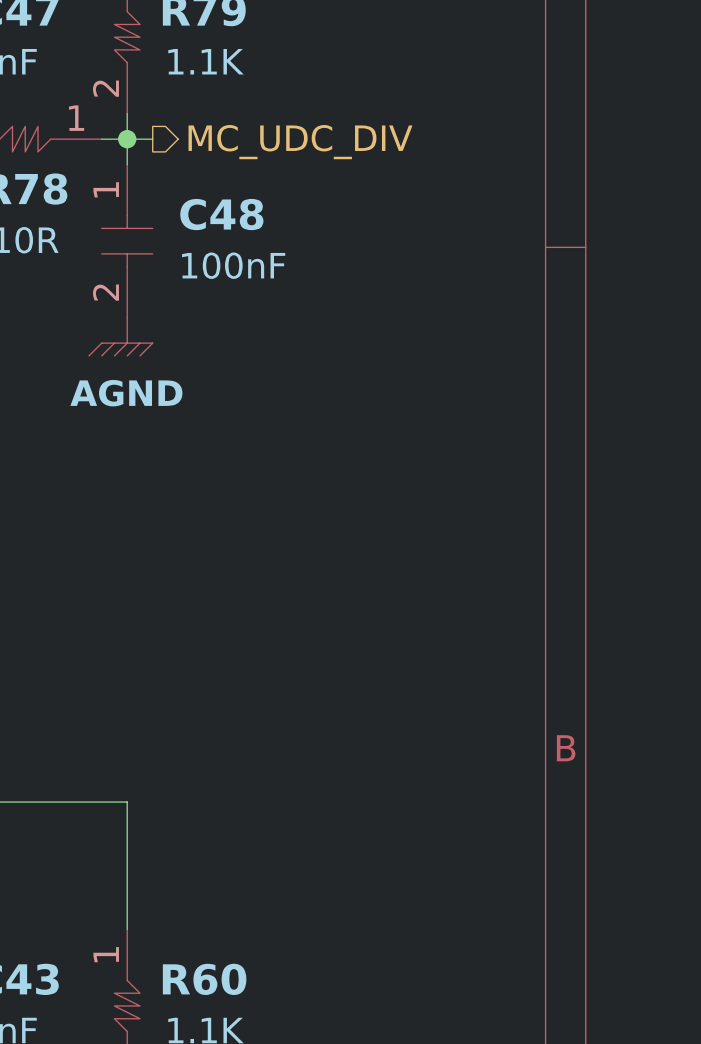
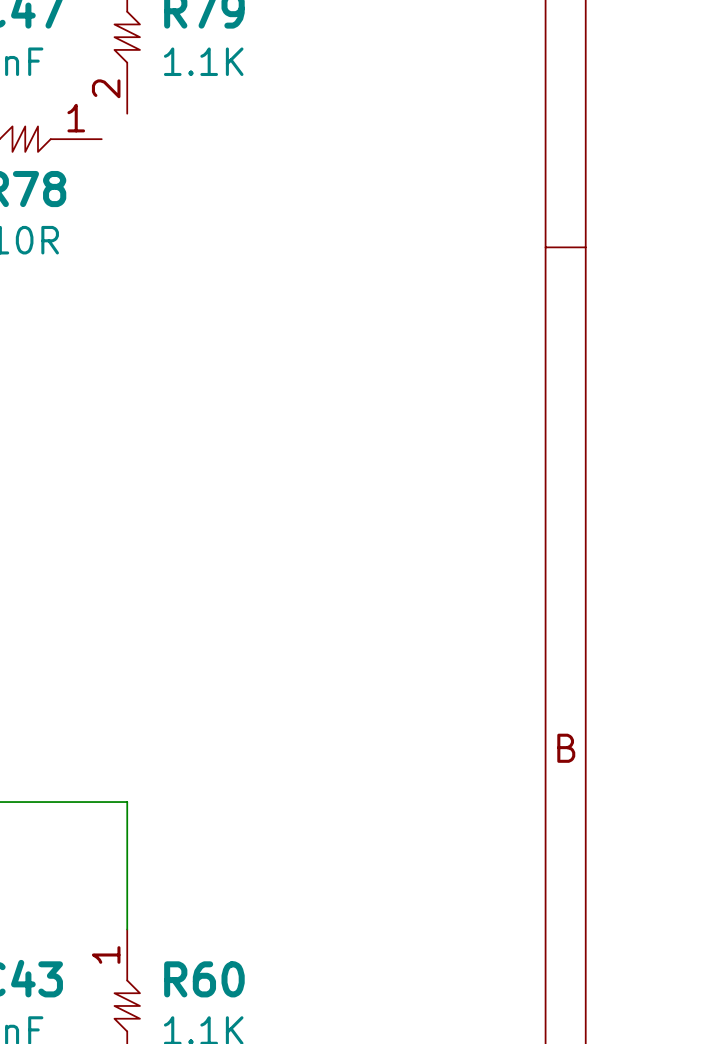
wire: (127, 113) (127, 164) -> none
wire: (101, 139) (152, 139) -> none
junction: (127, 139) -> none
hierarchical label: MC_UDC_DIV (300, 142) -> none
C48: 100nF (127, 241) -> none
power symbol: AGND (120, 336) -> none

